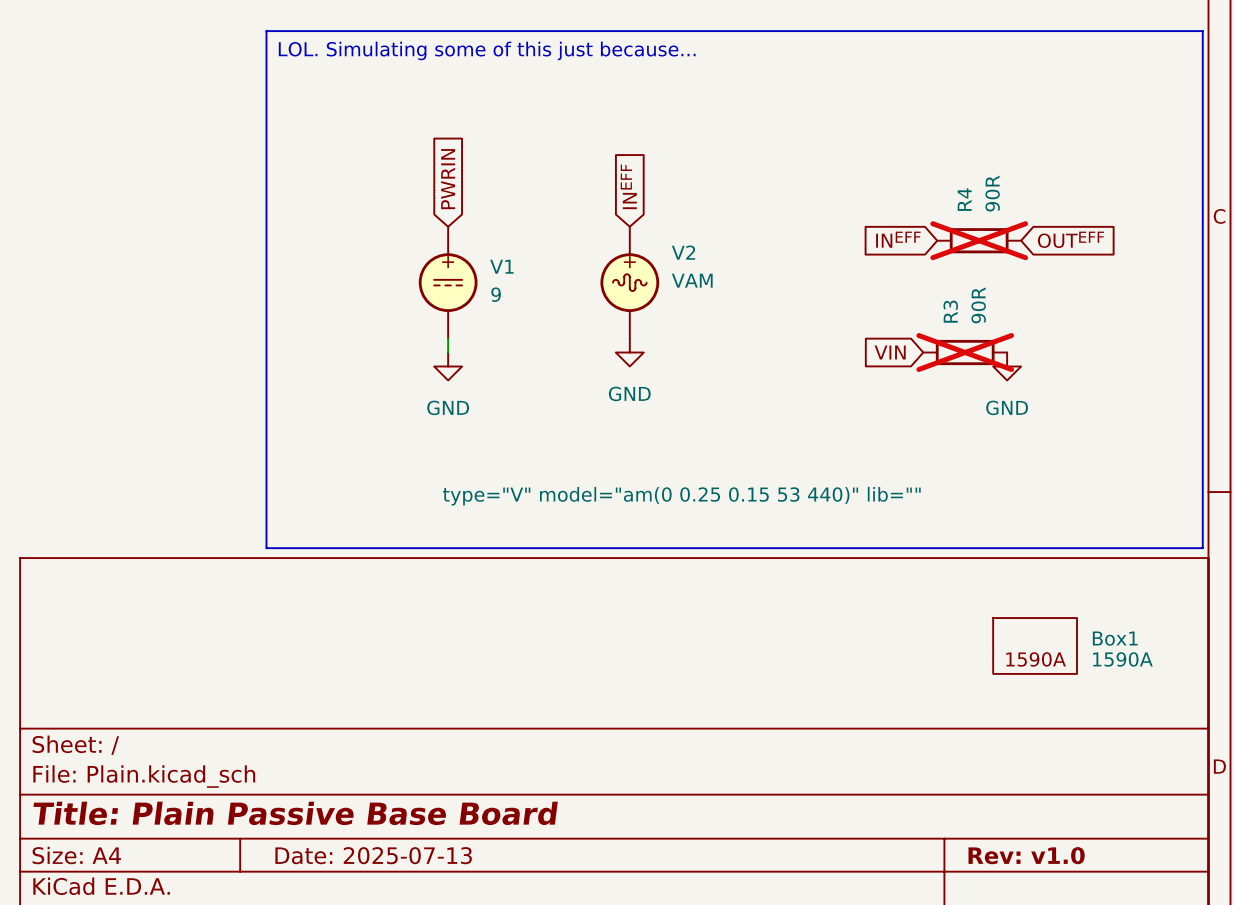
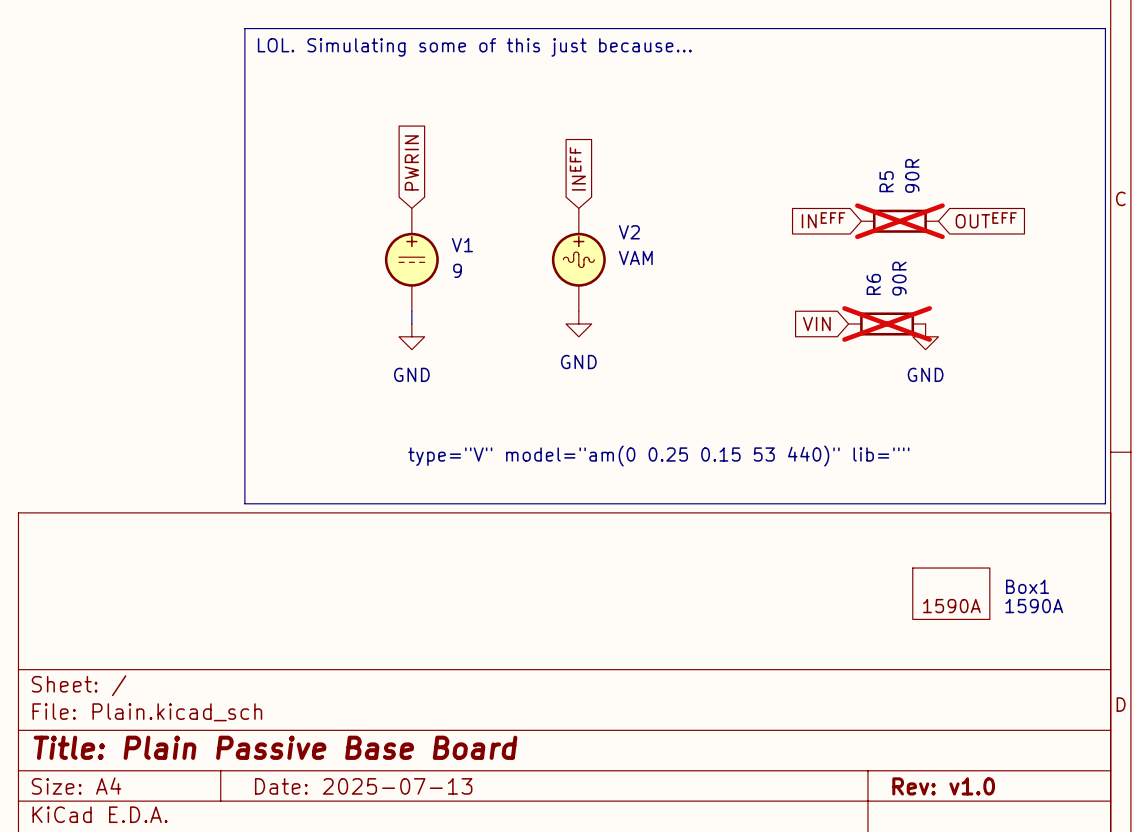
R4 name: R4 (964, 199) -> R5 (886, 181)
R3 name: R3 (950, 311) -> R6 (873, 284)

